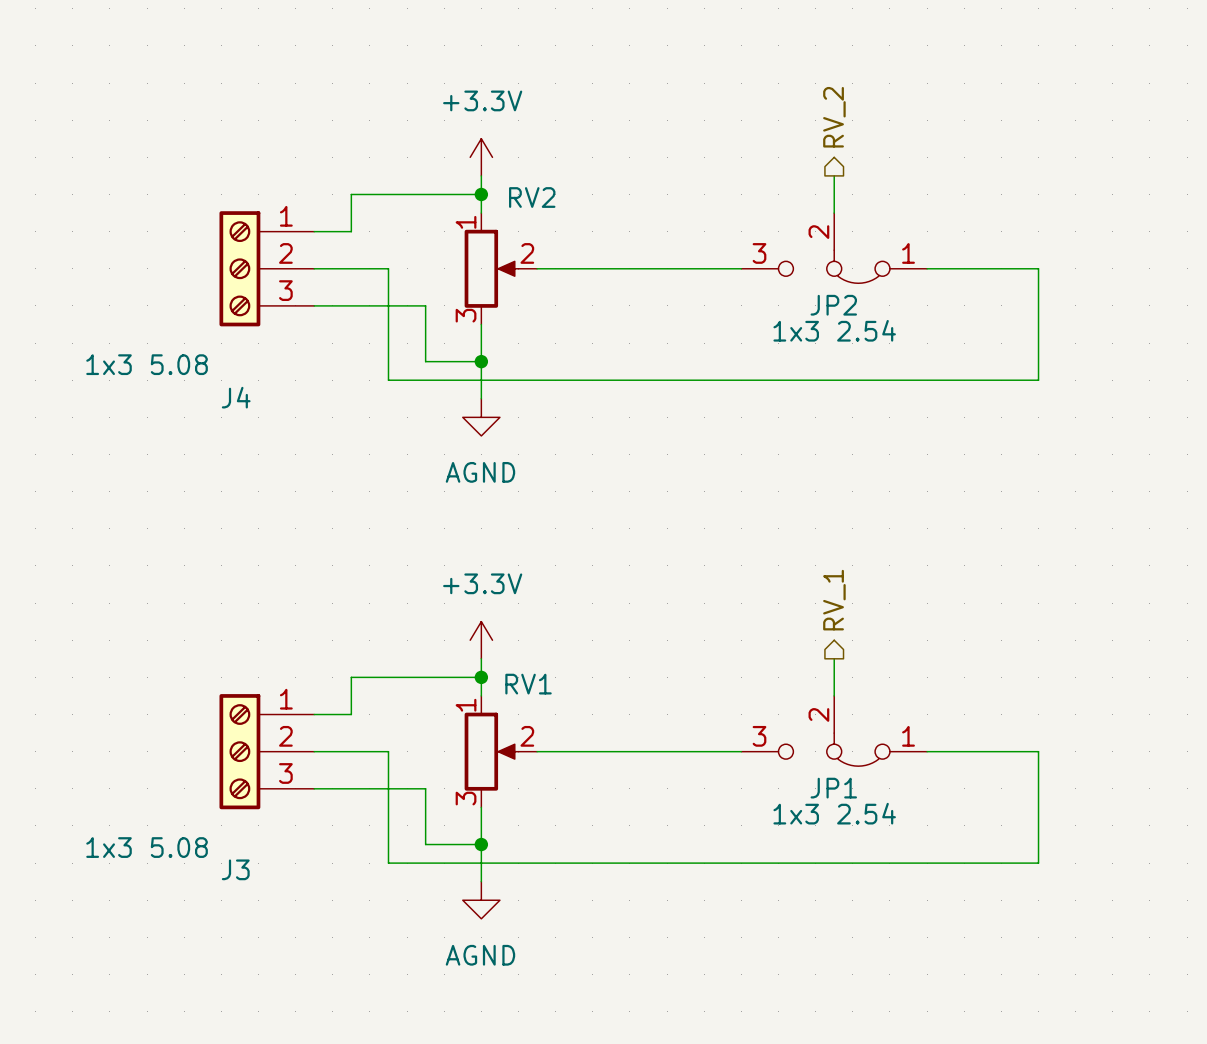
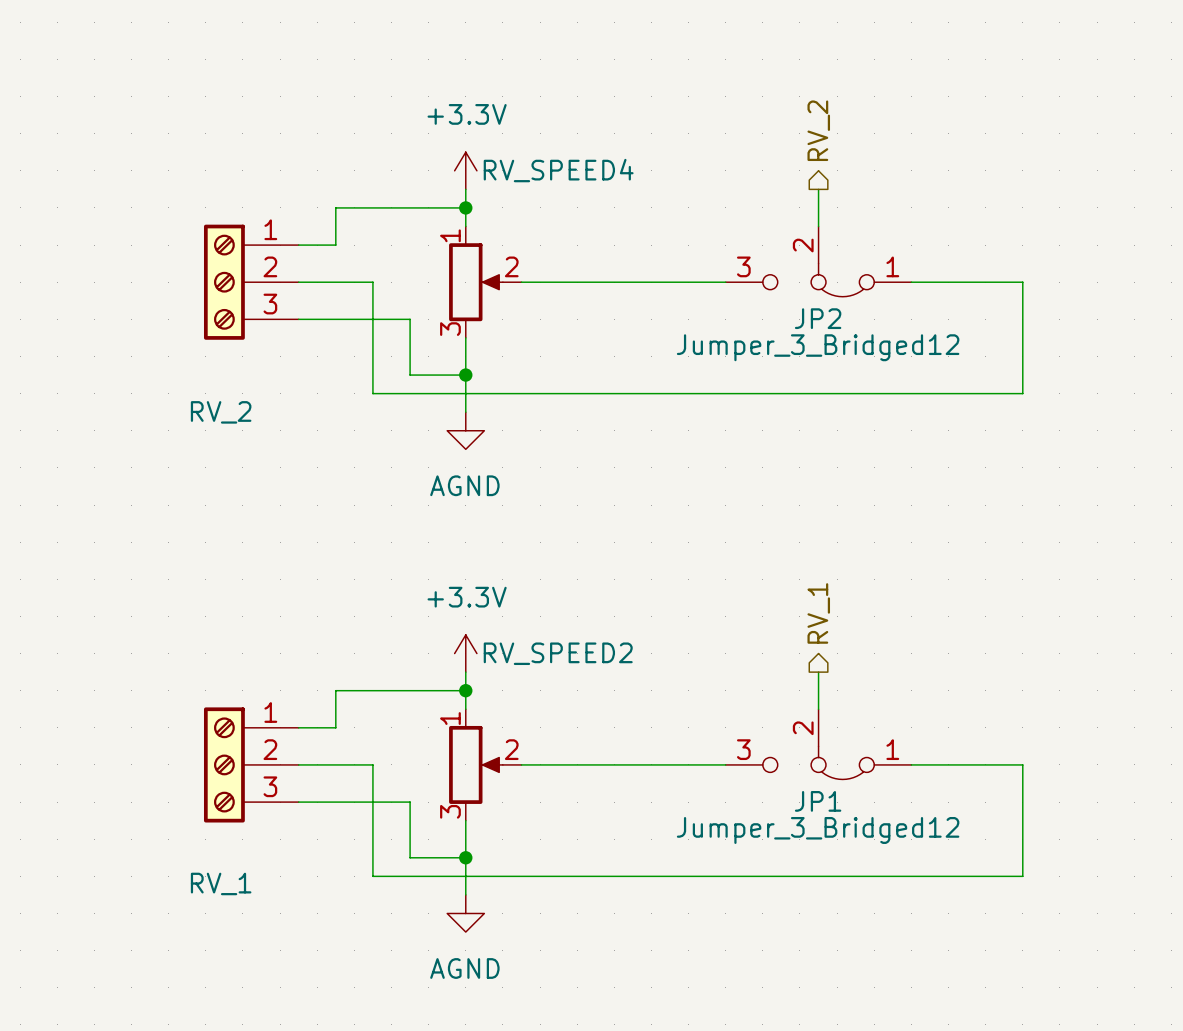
RV2 name: RV2 (532, 197) -> RV_SPEED4 (558, 170)
JP2 value: 1x3 2.54 (834, 330) -> Jumper_3_Bridged12 (818, 347)
J4 value: 1x3 5.08 (147, 364) -> none
J4 name: J4 (236, 397) -> RV_2 (221, 412)
RV1 name: RV1 (528, 684) -> RV_SPEED2 (558, 653)
JP1 value: 1x3 2.54 (834, 813) -> Jumper_3_Bridged12 (818, 830)
J3 value: 1x3 5.08 (147, 847) -> none
J3 name: J3 (235, 869) -> RV_1 (221, 883)

